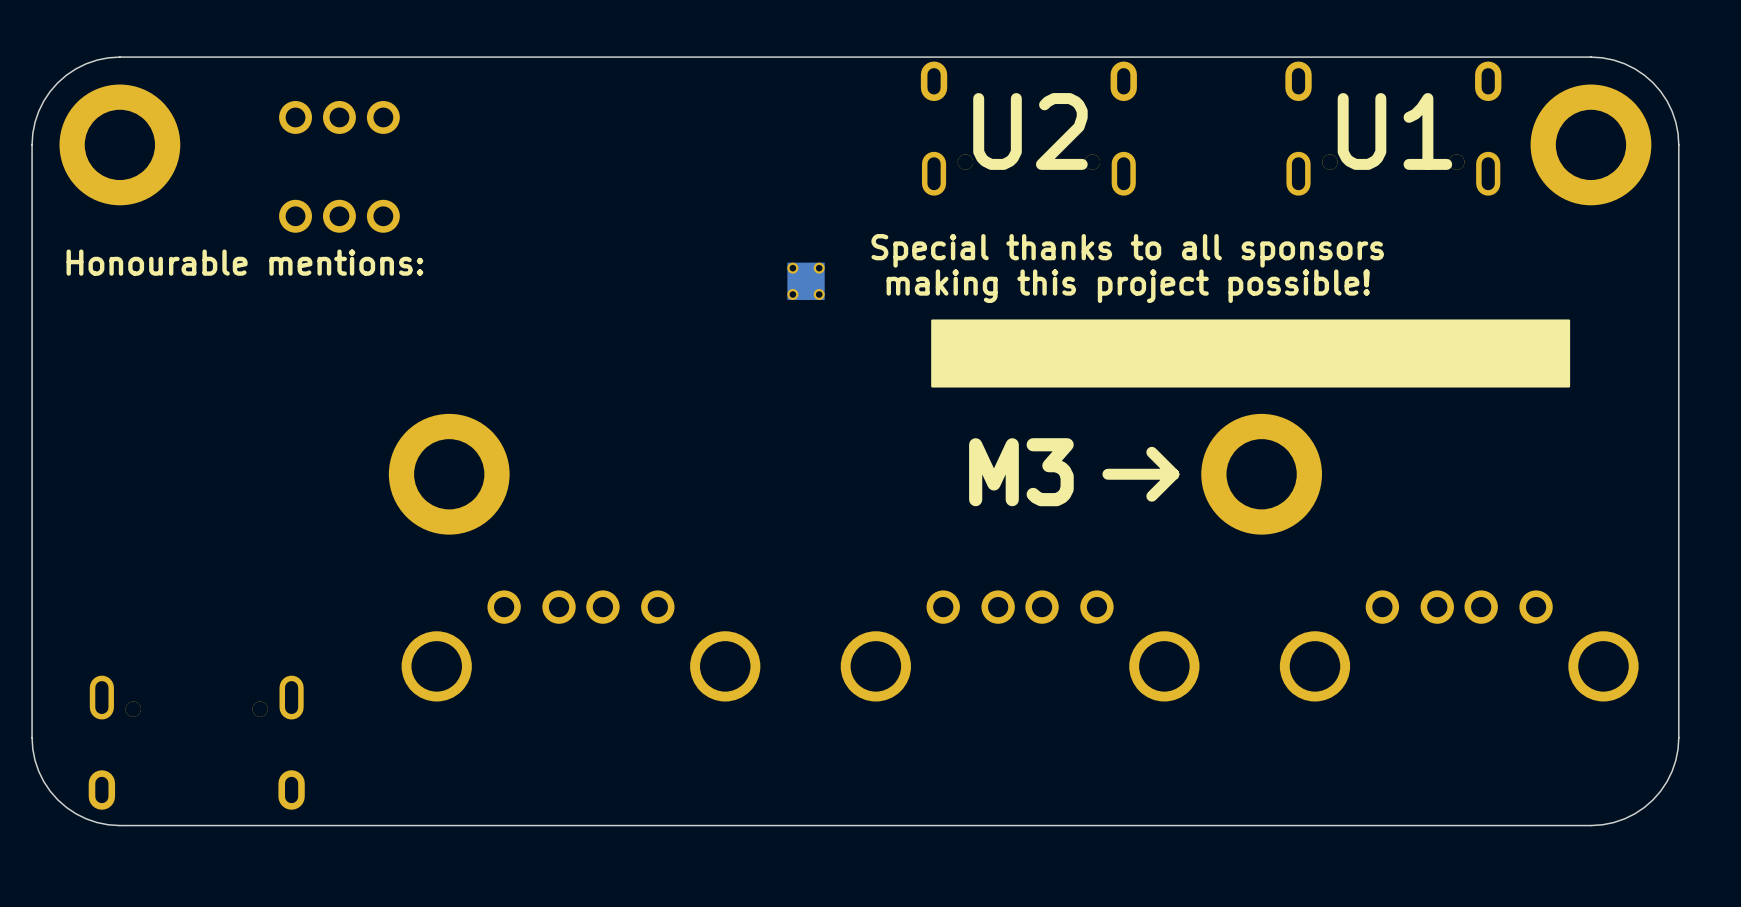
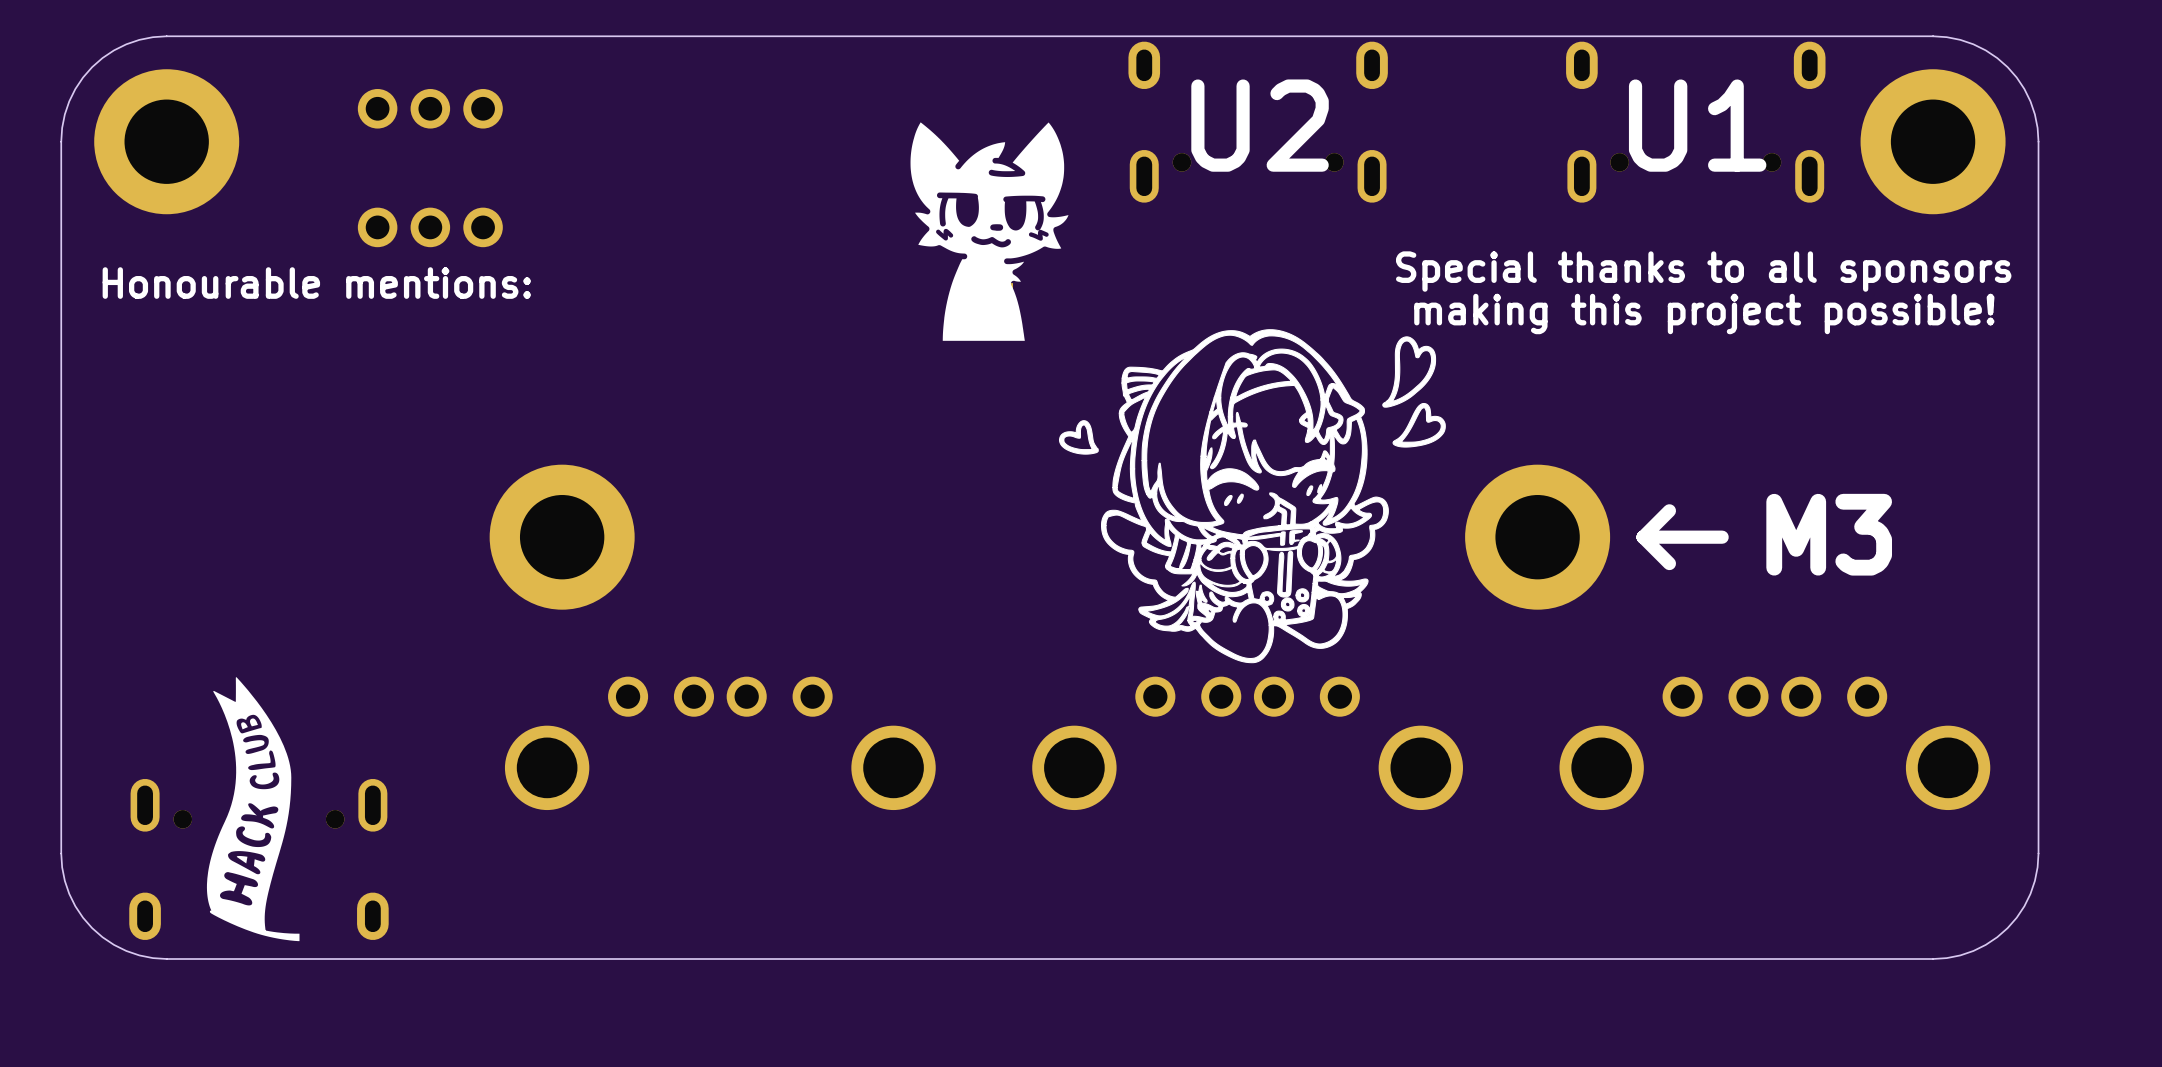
drawing: none -> [910, 122, 1069, 341]
text position: Special thanks to all sponsors (1127, 250) -> Special thanks to all sponsors (1703, 271)
text position: making this project possible! (1128, 286) -> making this project possible! (1704, 313)
drawing: none -> [1059, 329, 1446, 664]
drawing: [931, 319, 1571, 388] -> none
line: (1151, 452) (1173, 474) -> (1643, 537) (1669, 563)
text position: M3 (1021, 472) -> M3 (1829, 534)
line: (1173, 474) (1151, 496) -> (1669, 510) (1643, 537)
line: (1173, 474) (1107, 474) -> (1722, 537) (1643, 537)
drawing: none -> [206, 677, 300, 942]

